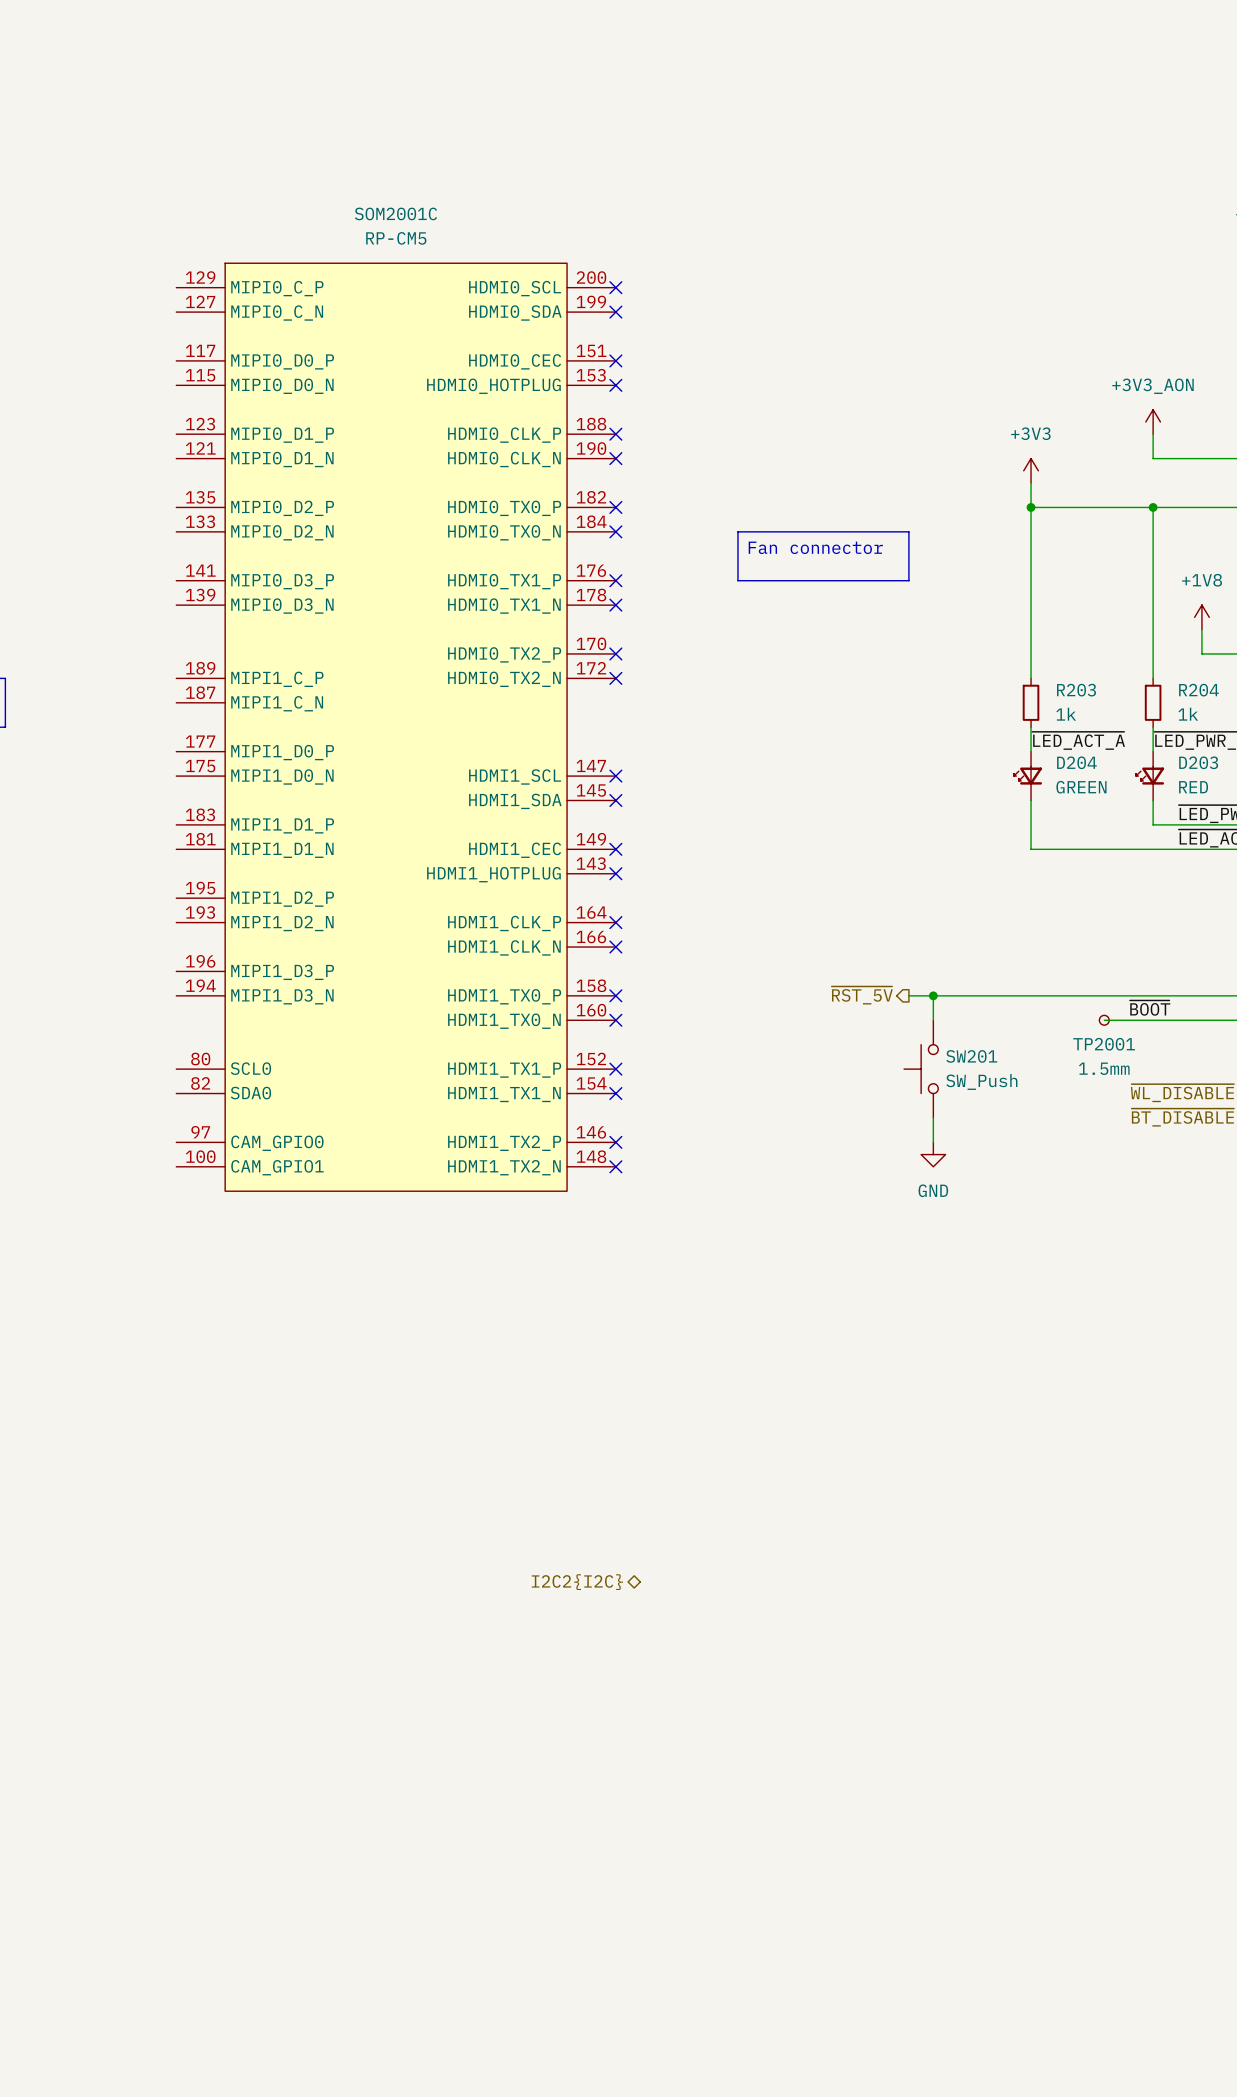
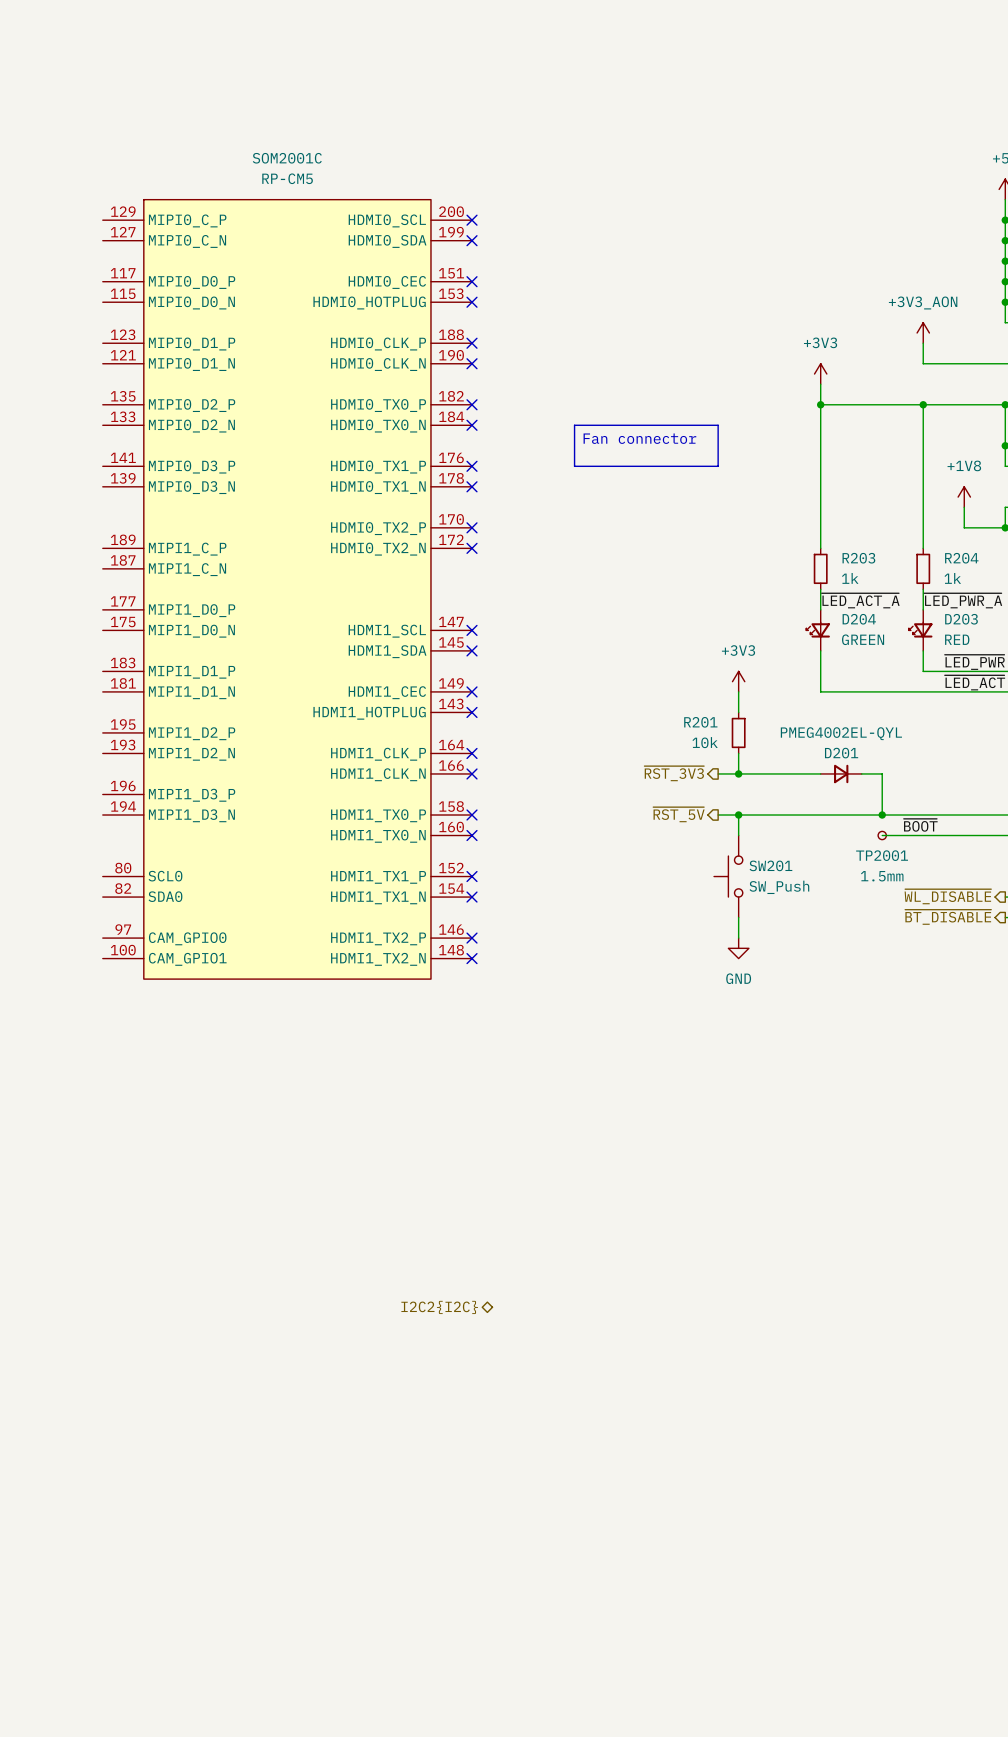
power symbol: none -> +3V3 (738, 681)
wire: none -> (738, 691) (738, 712)
R201: none -> 10k (738, 732)
wire: none -> (738, 753) (738, 773)
hierarchical label: none -> ~{RST_3V3} (674, 773)
wire: none -> (718, 773) (820, 773)
junction: none -> (738, 773)
D201: none -> PMEG4002EL-QYL (841, 773)
wire: none -> (861, 773) (882, 773) (882, 815)
junction: none -> (882, 815)

